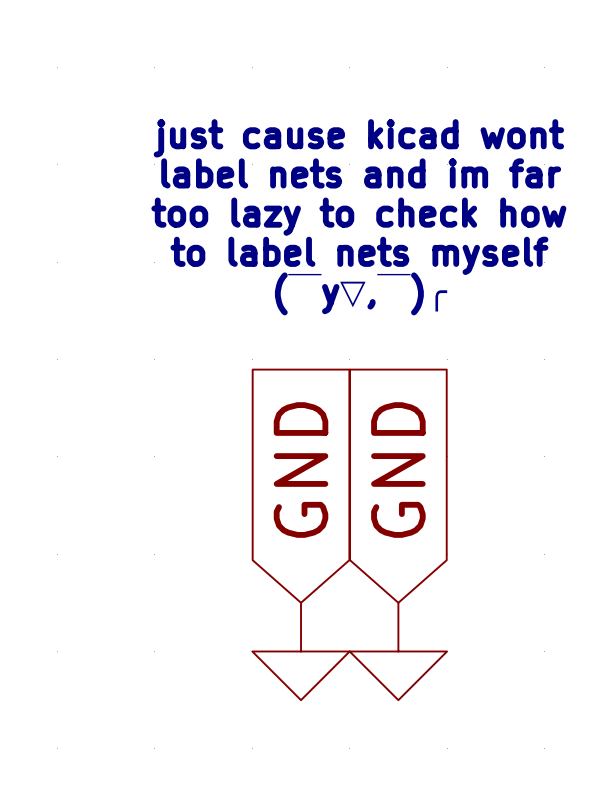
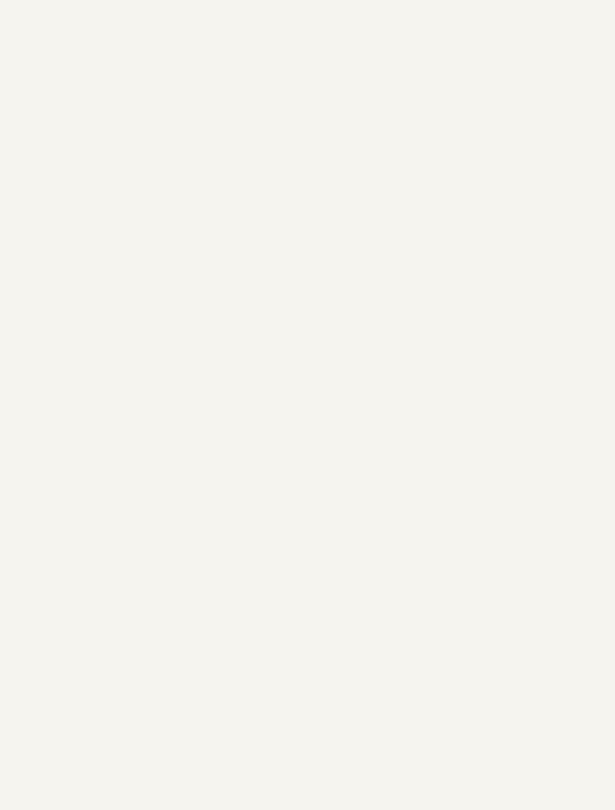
text: just cause kicad wont (358, 138) -> none
text: label nets and im far (361, 173) -> none
text: too lazy to check how (358, 216) -> none
text: to label nets myself (359, 255) -> none
text: (￣y▽,￣)╭ (362, 293) -> none
global label: GND (301, 470) -> none
global label: GND (398, 470) -> none
power symbol: (301, 651) -> none
power symbol: (398, 651) -> none

